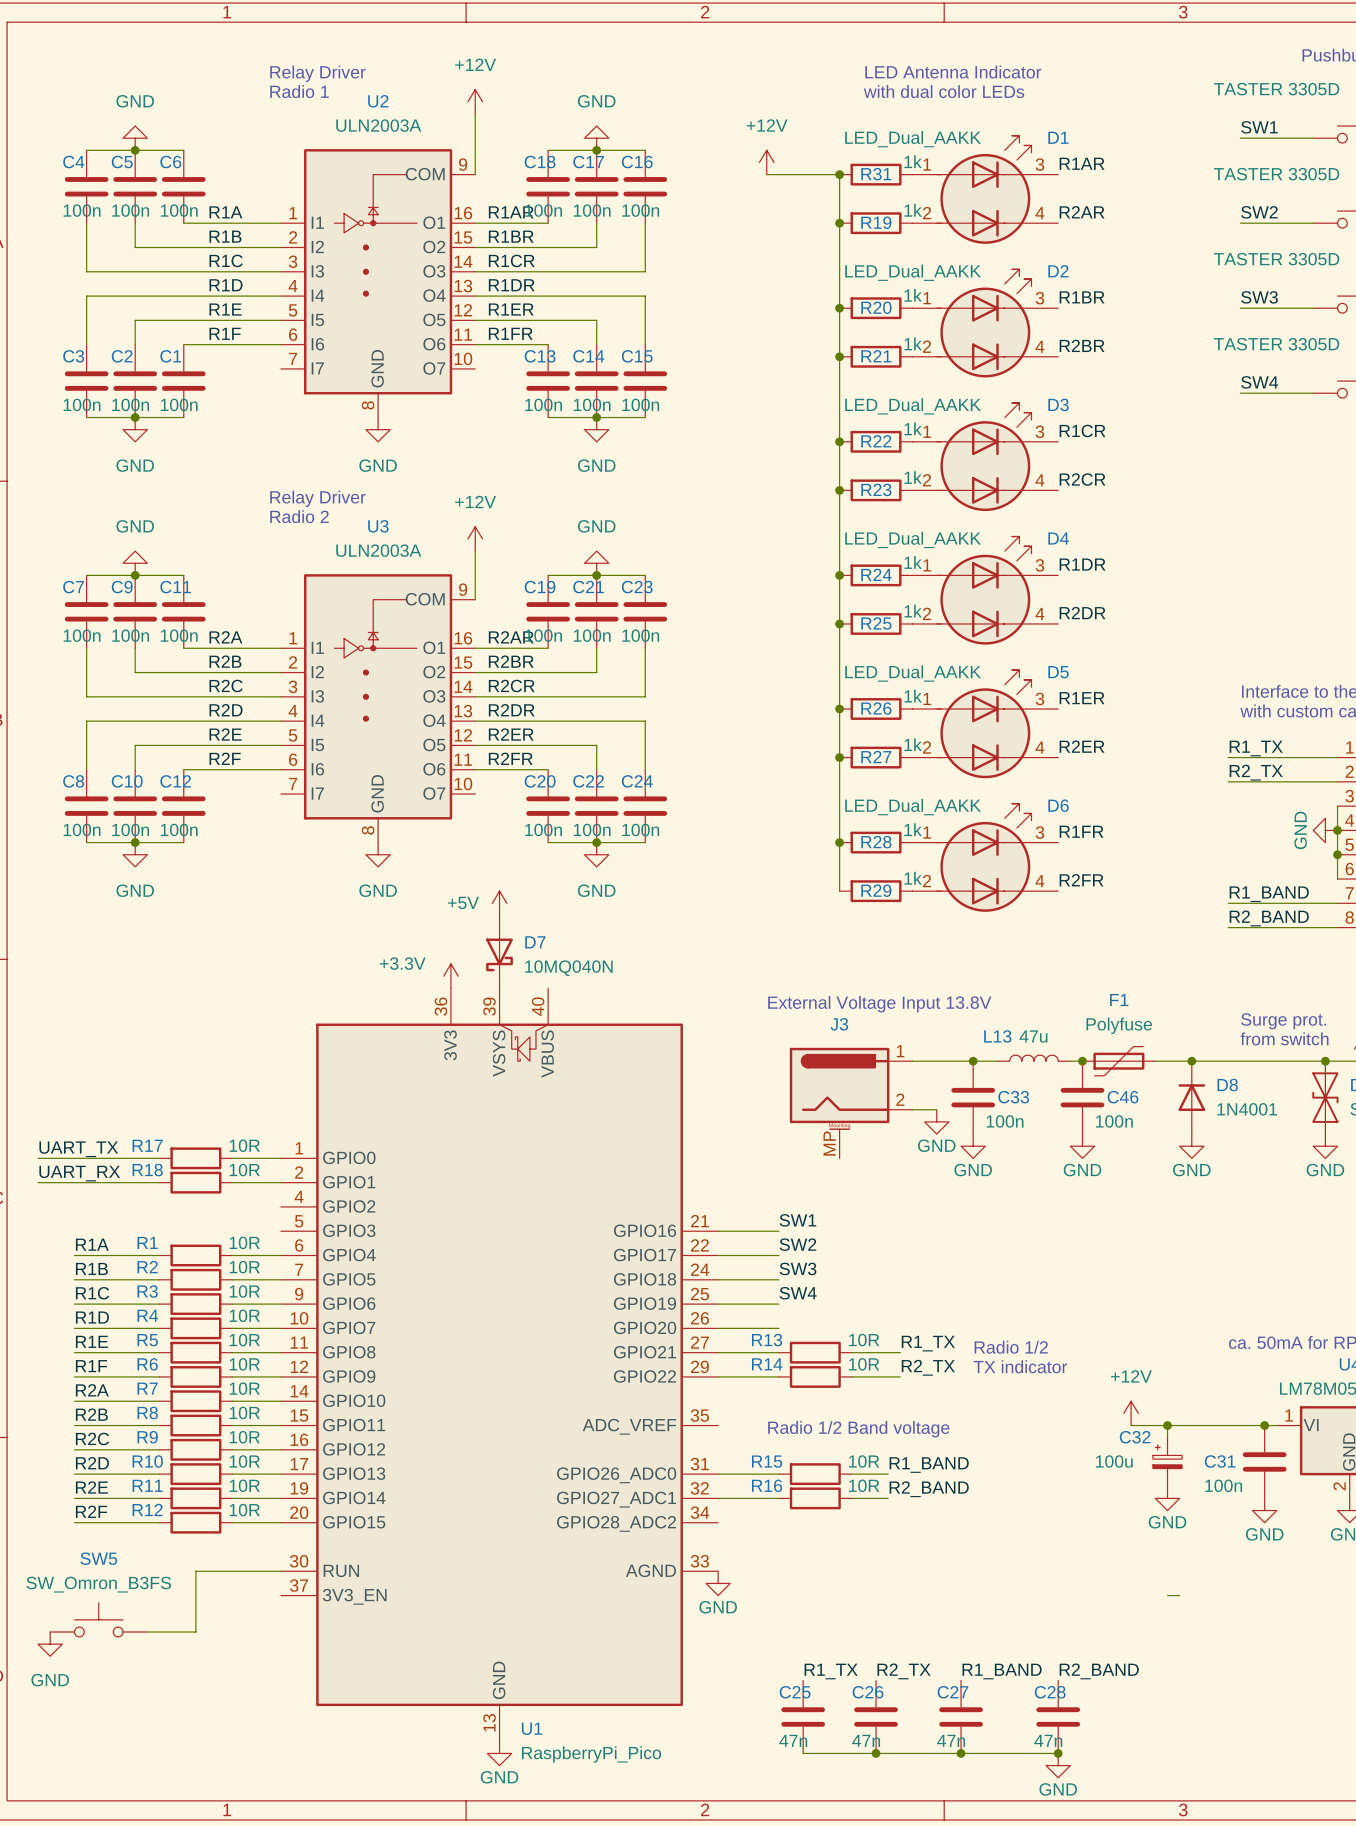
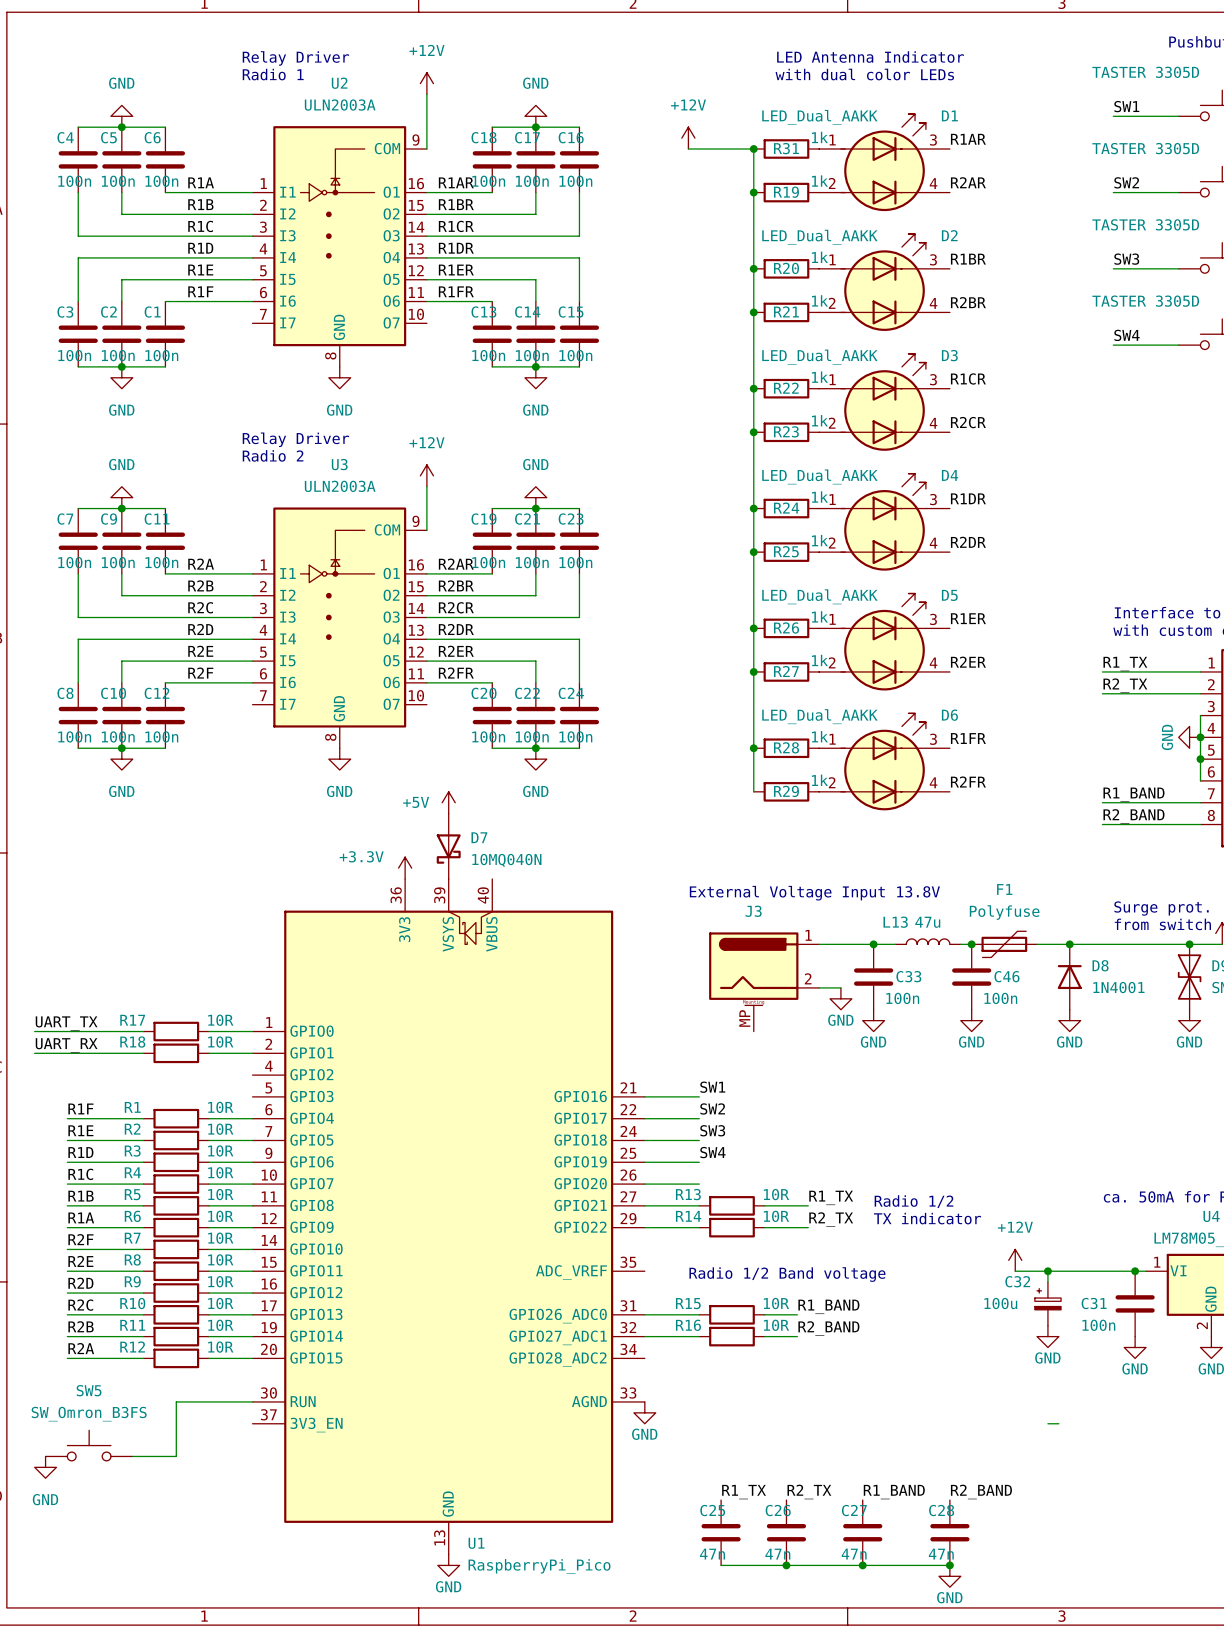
label: R1A (92, 1244) -> R1F (80, 1108)
label: R1B (91, 1268) -> R1E (80, 1130)
label: R1C (92, 1293) -> R1D (80, 1152)
label: R1D (92, 1317) -> R1C (80, 1174)
label: R1E (91, 1341) -> R1B (81, 1196)
label: R1F (91, 1366) -> R1A (81, 1217)
label: R2A (92, 1390) -> R2F (80, 1239)
label: R2B (91, 1414) -> R2E (80, 1261)
label: R2C (92, 1438) -> R2D (80, 1283)
label: R2D (92, 1463) -> R2C (80, 1305)
label: R2E (91, 1487) -> R2B (81, 1326)
label: R2F (91, 1511) -> R2A (81, 1348)

